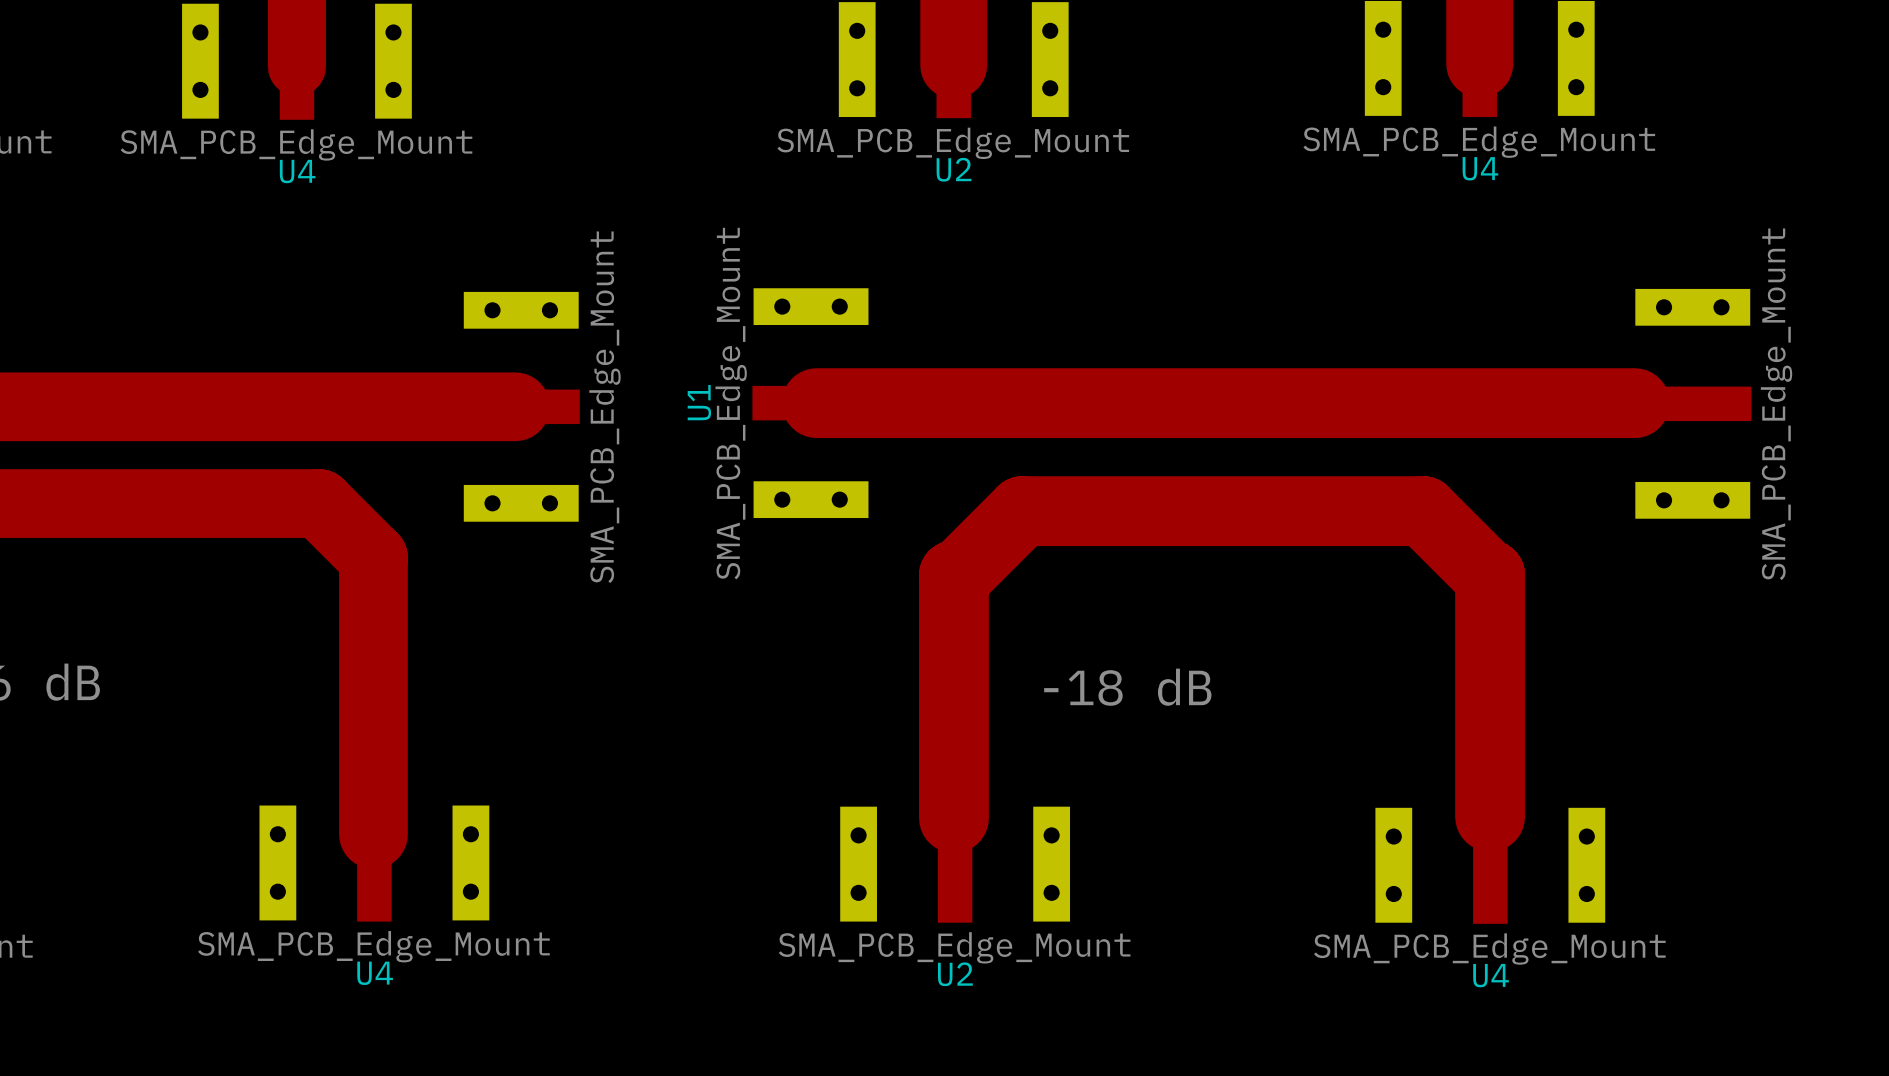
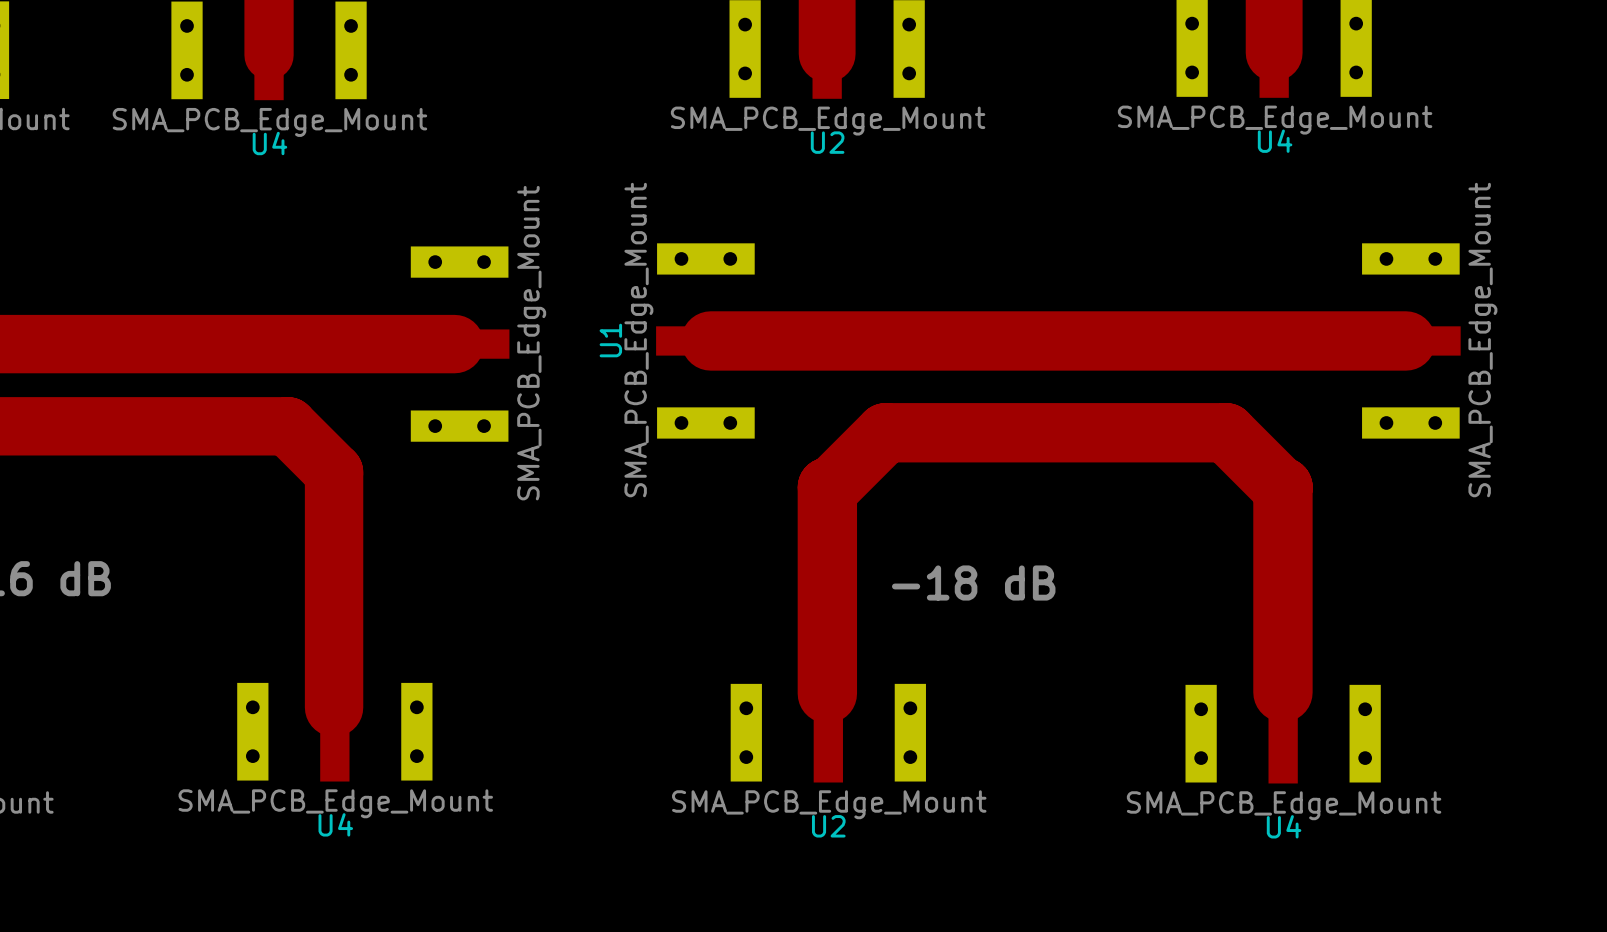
part position: (1687, 403) -> (1405, 340)

